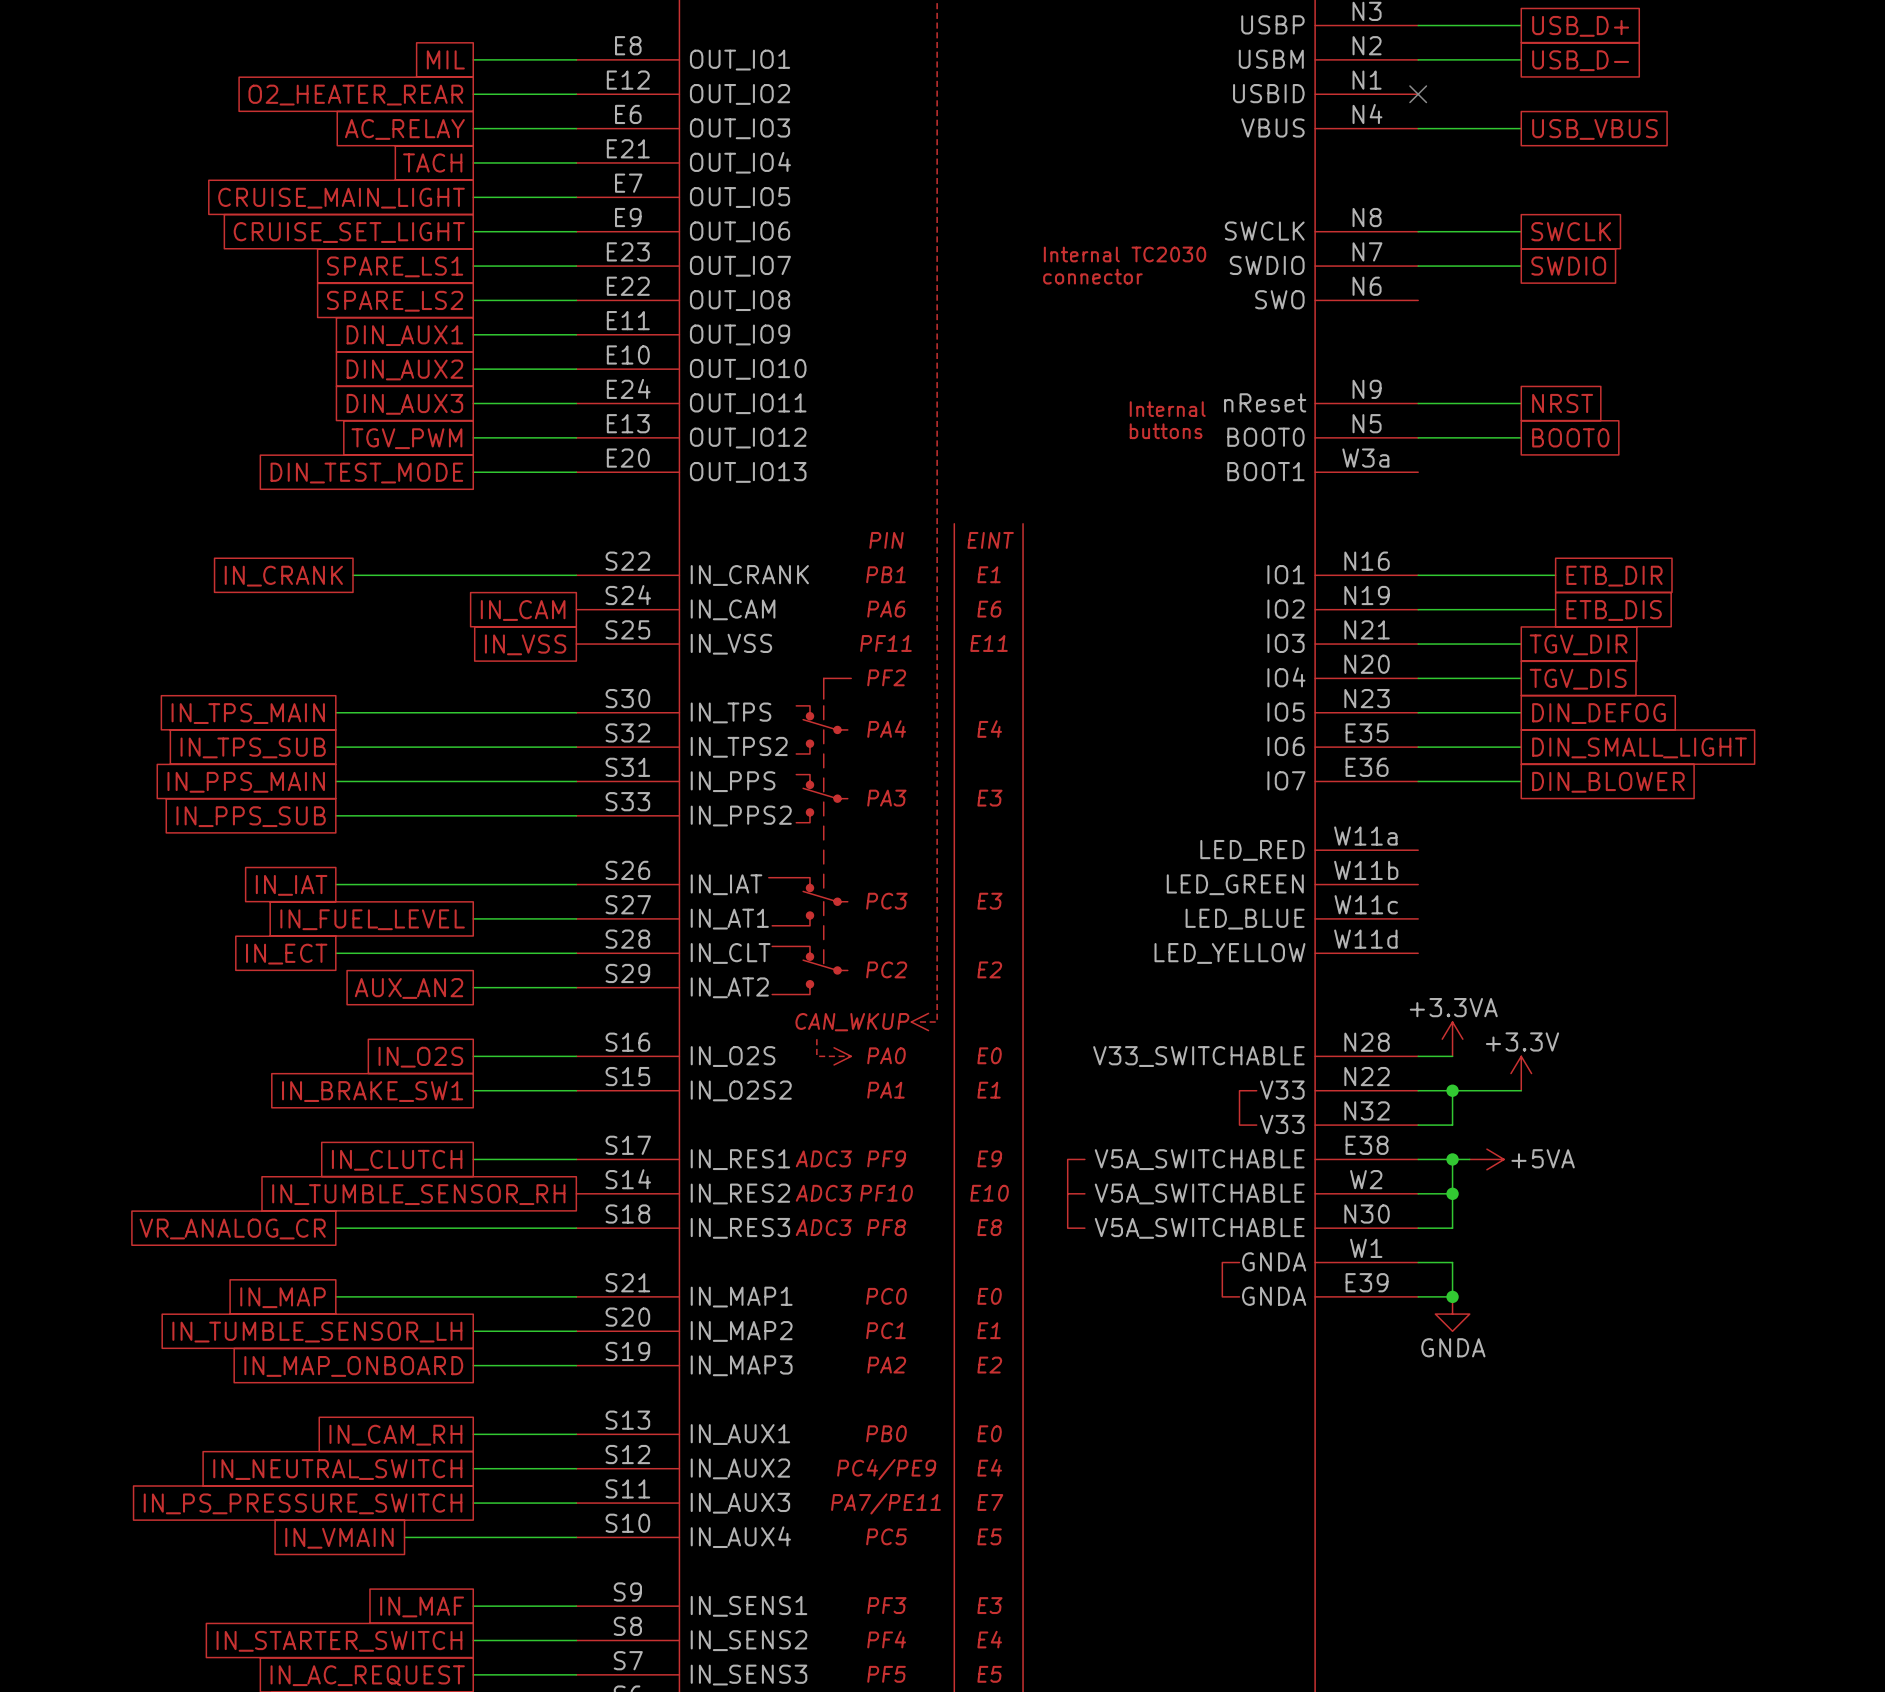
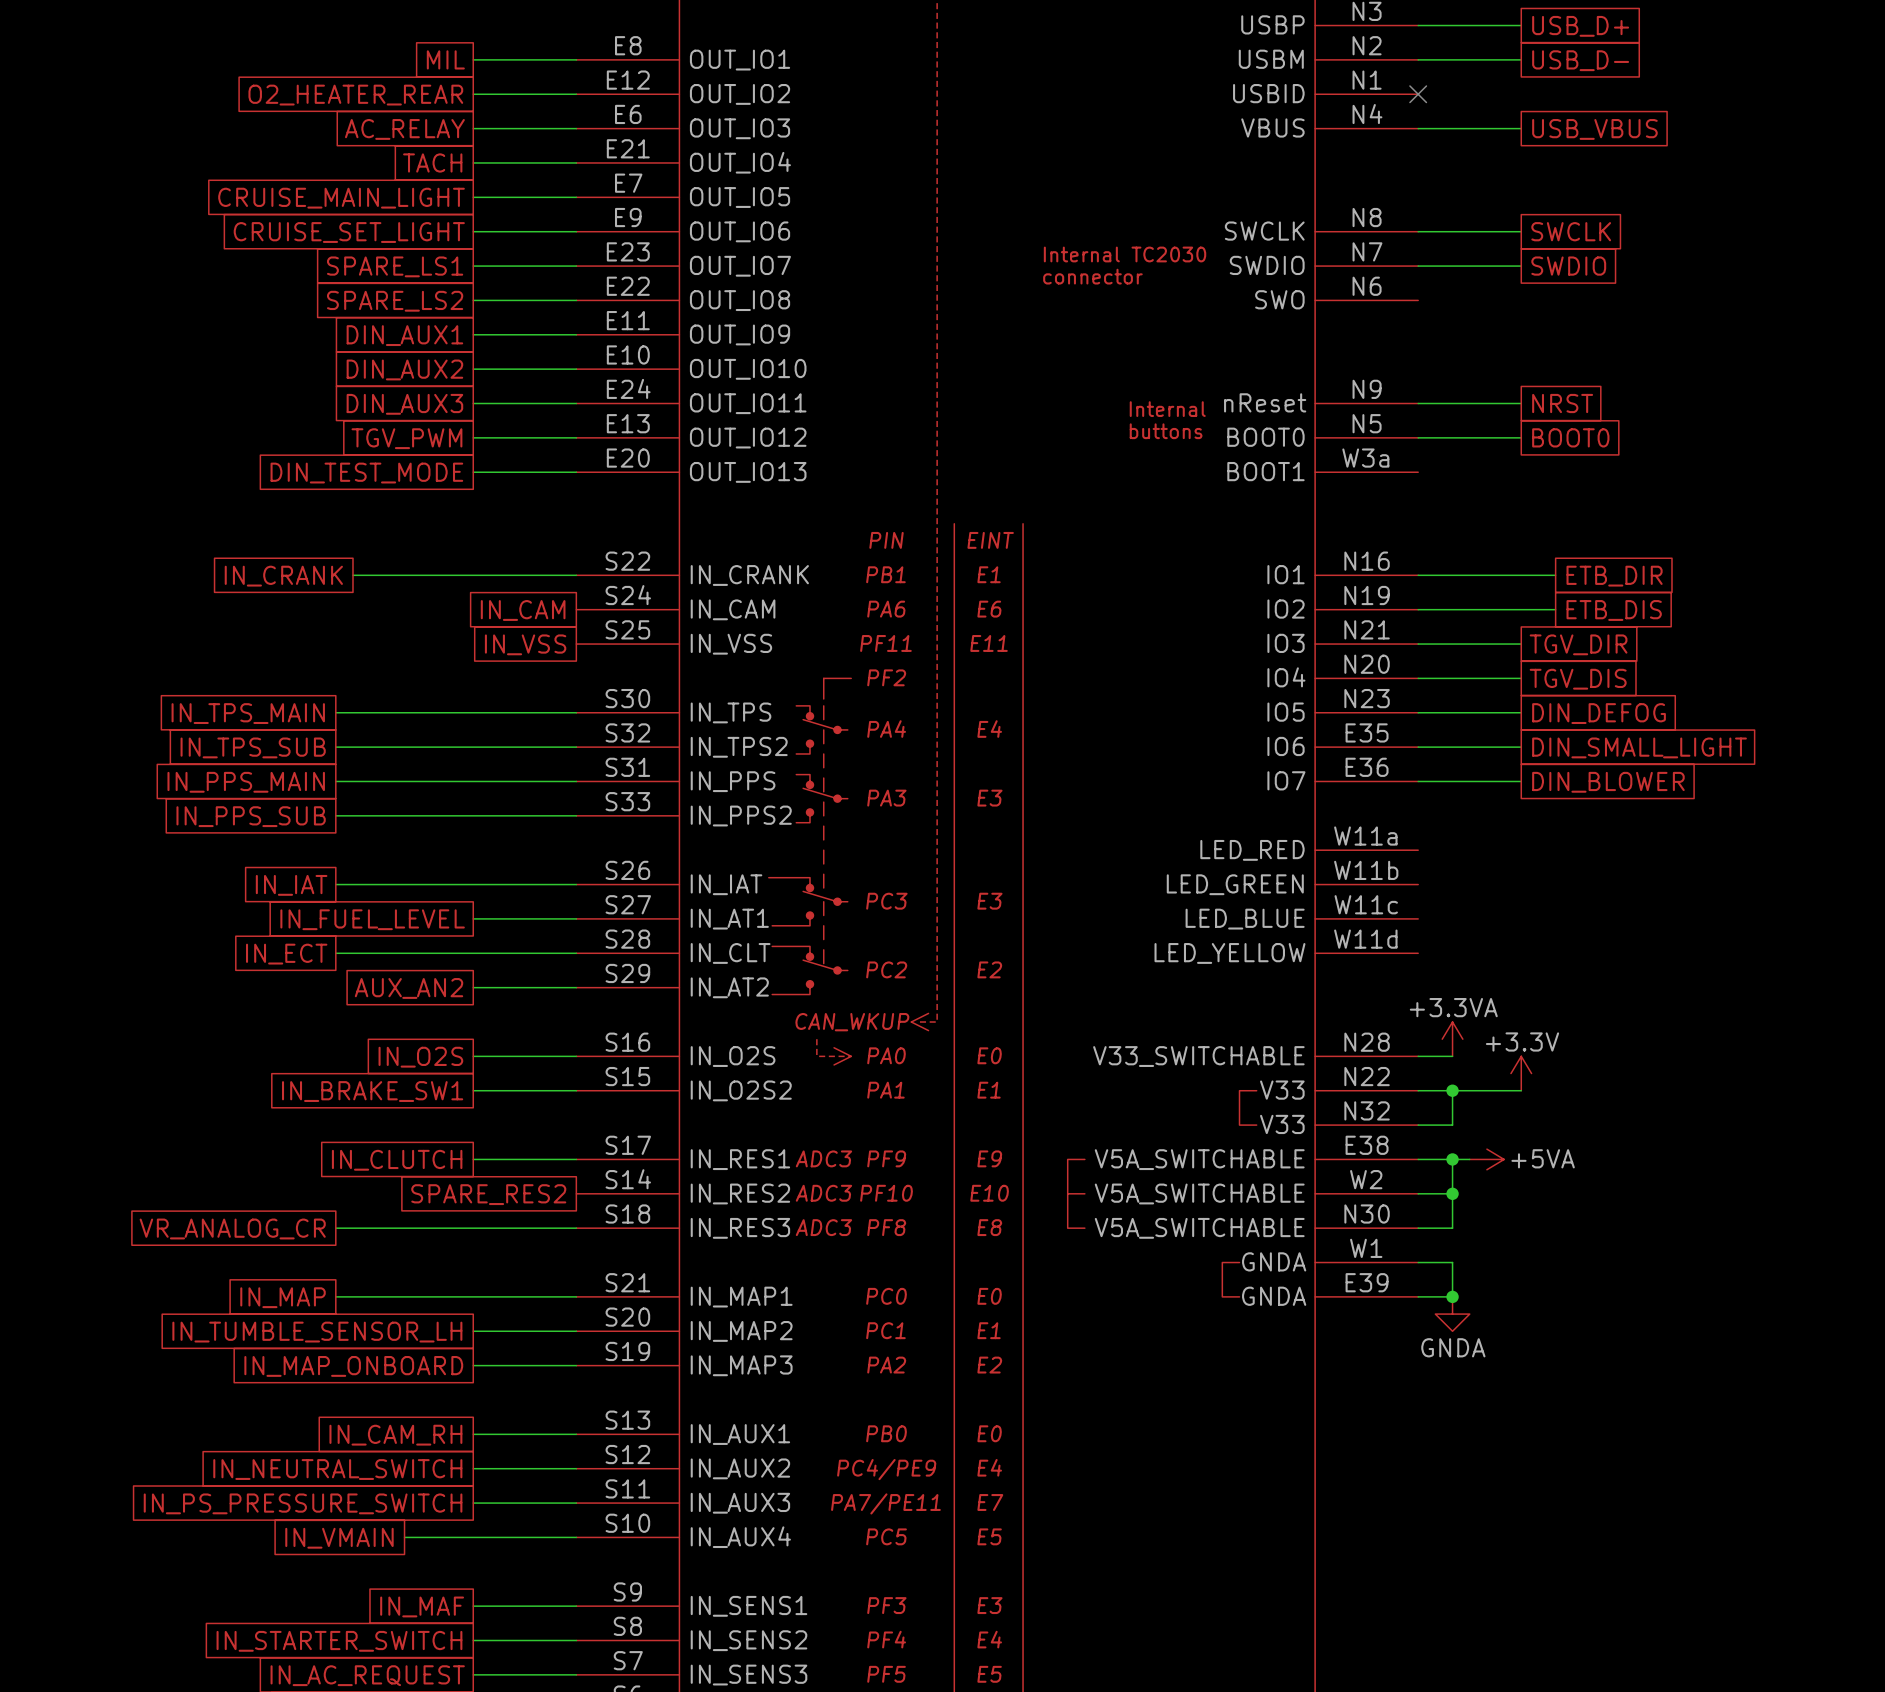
global label: IN_TUMBLE_SENSOR_RH (418, 1194) -> SPARE_RES2 (488, 1194)

